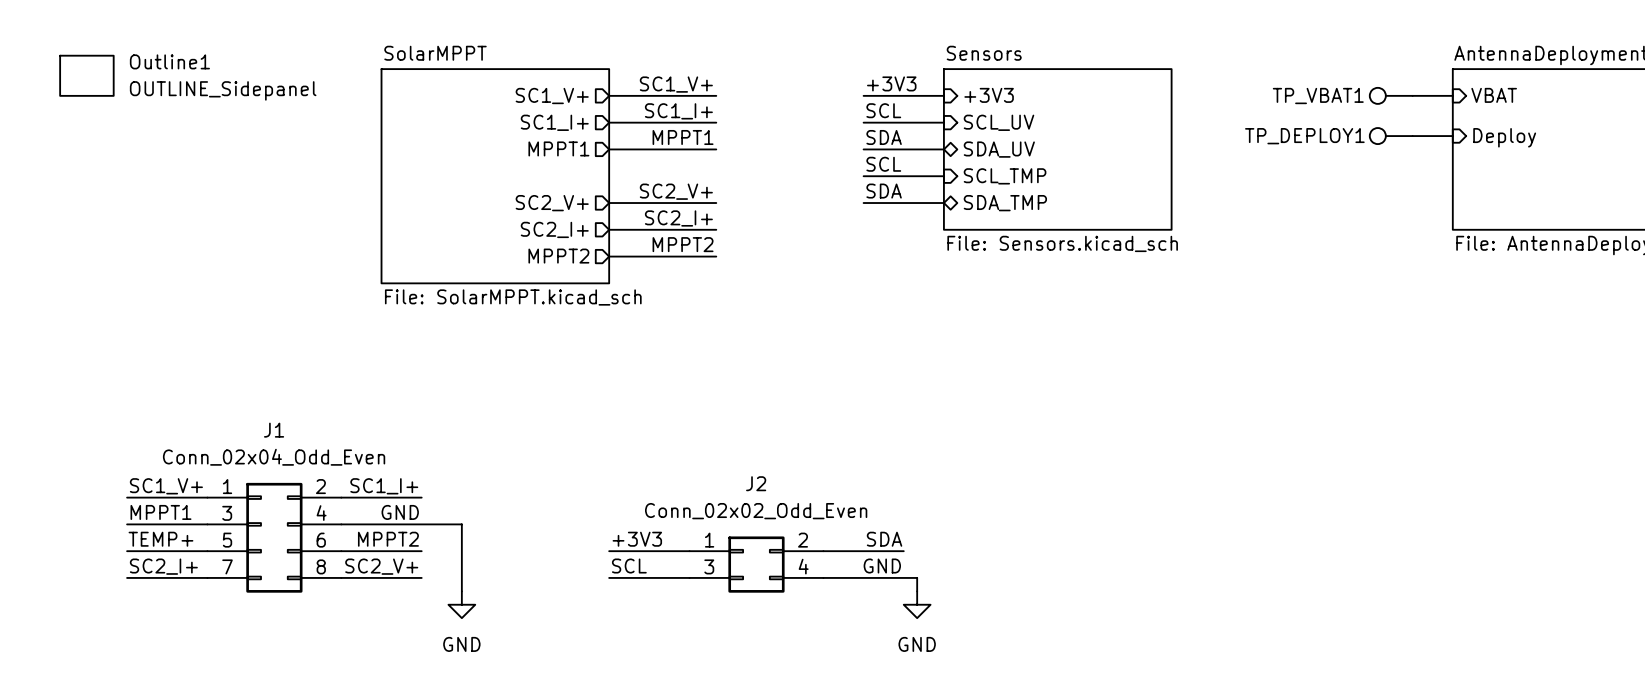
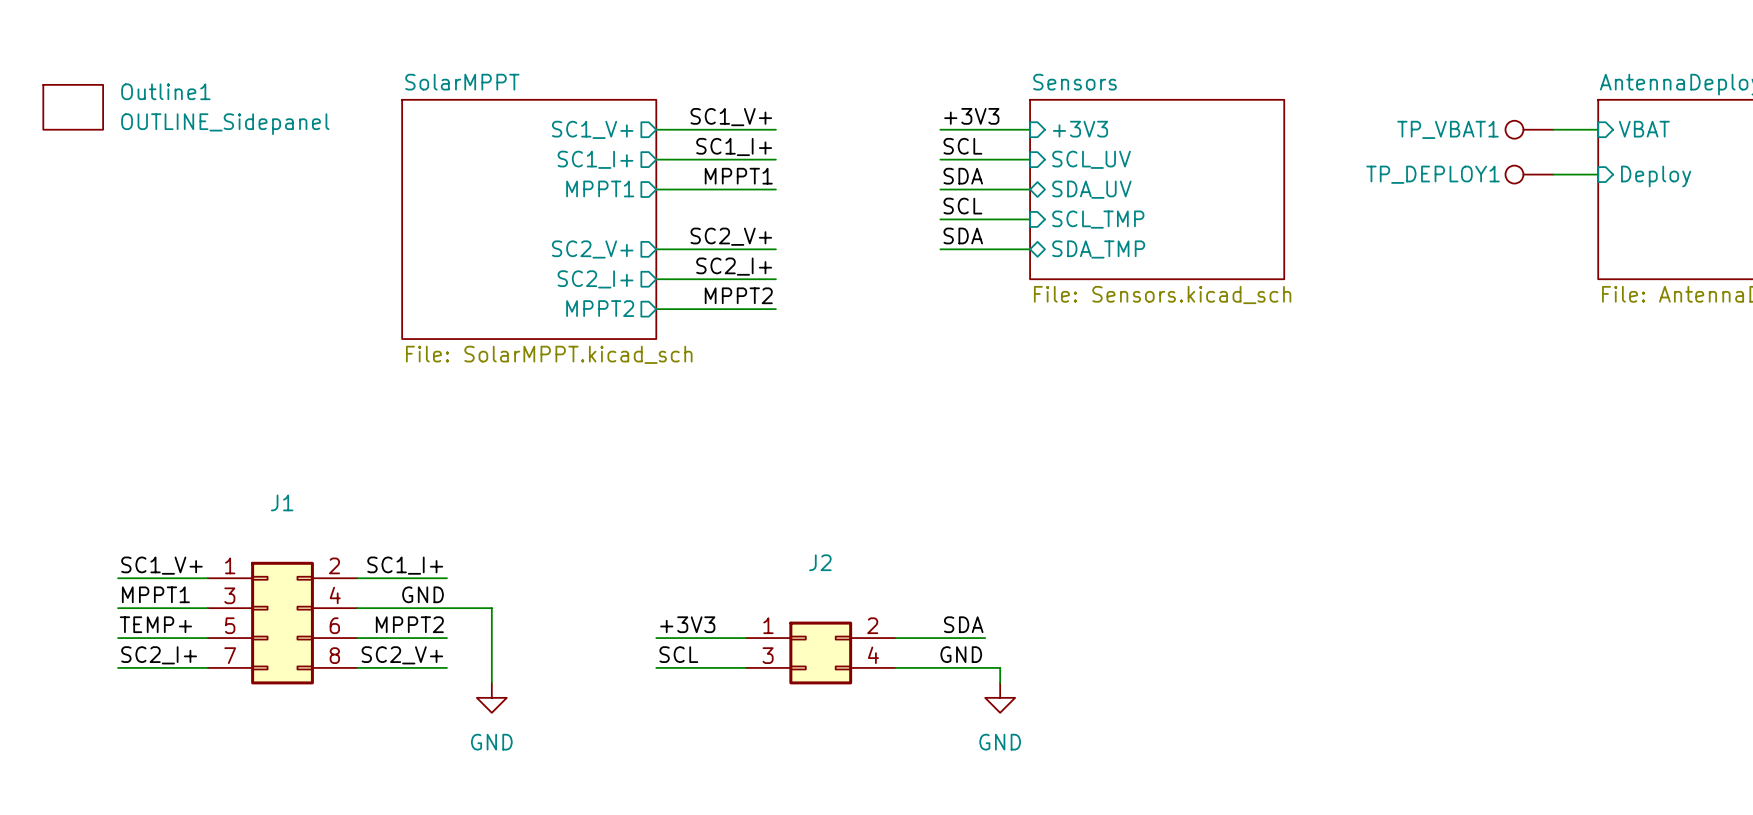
J1 value: Conn_02x04_Odd_Even (274, 457) -> none
J2 value: Conn_02x02_Odd_Even (756, 511) -> none

